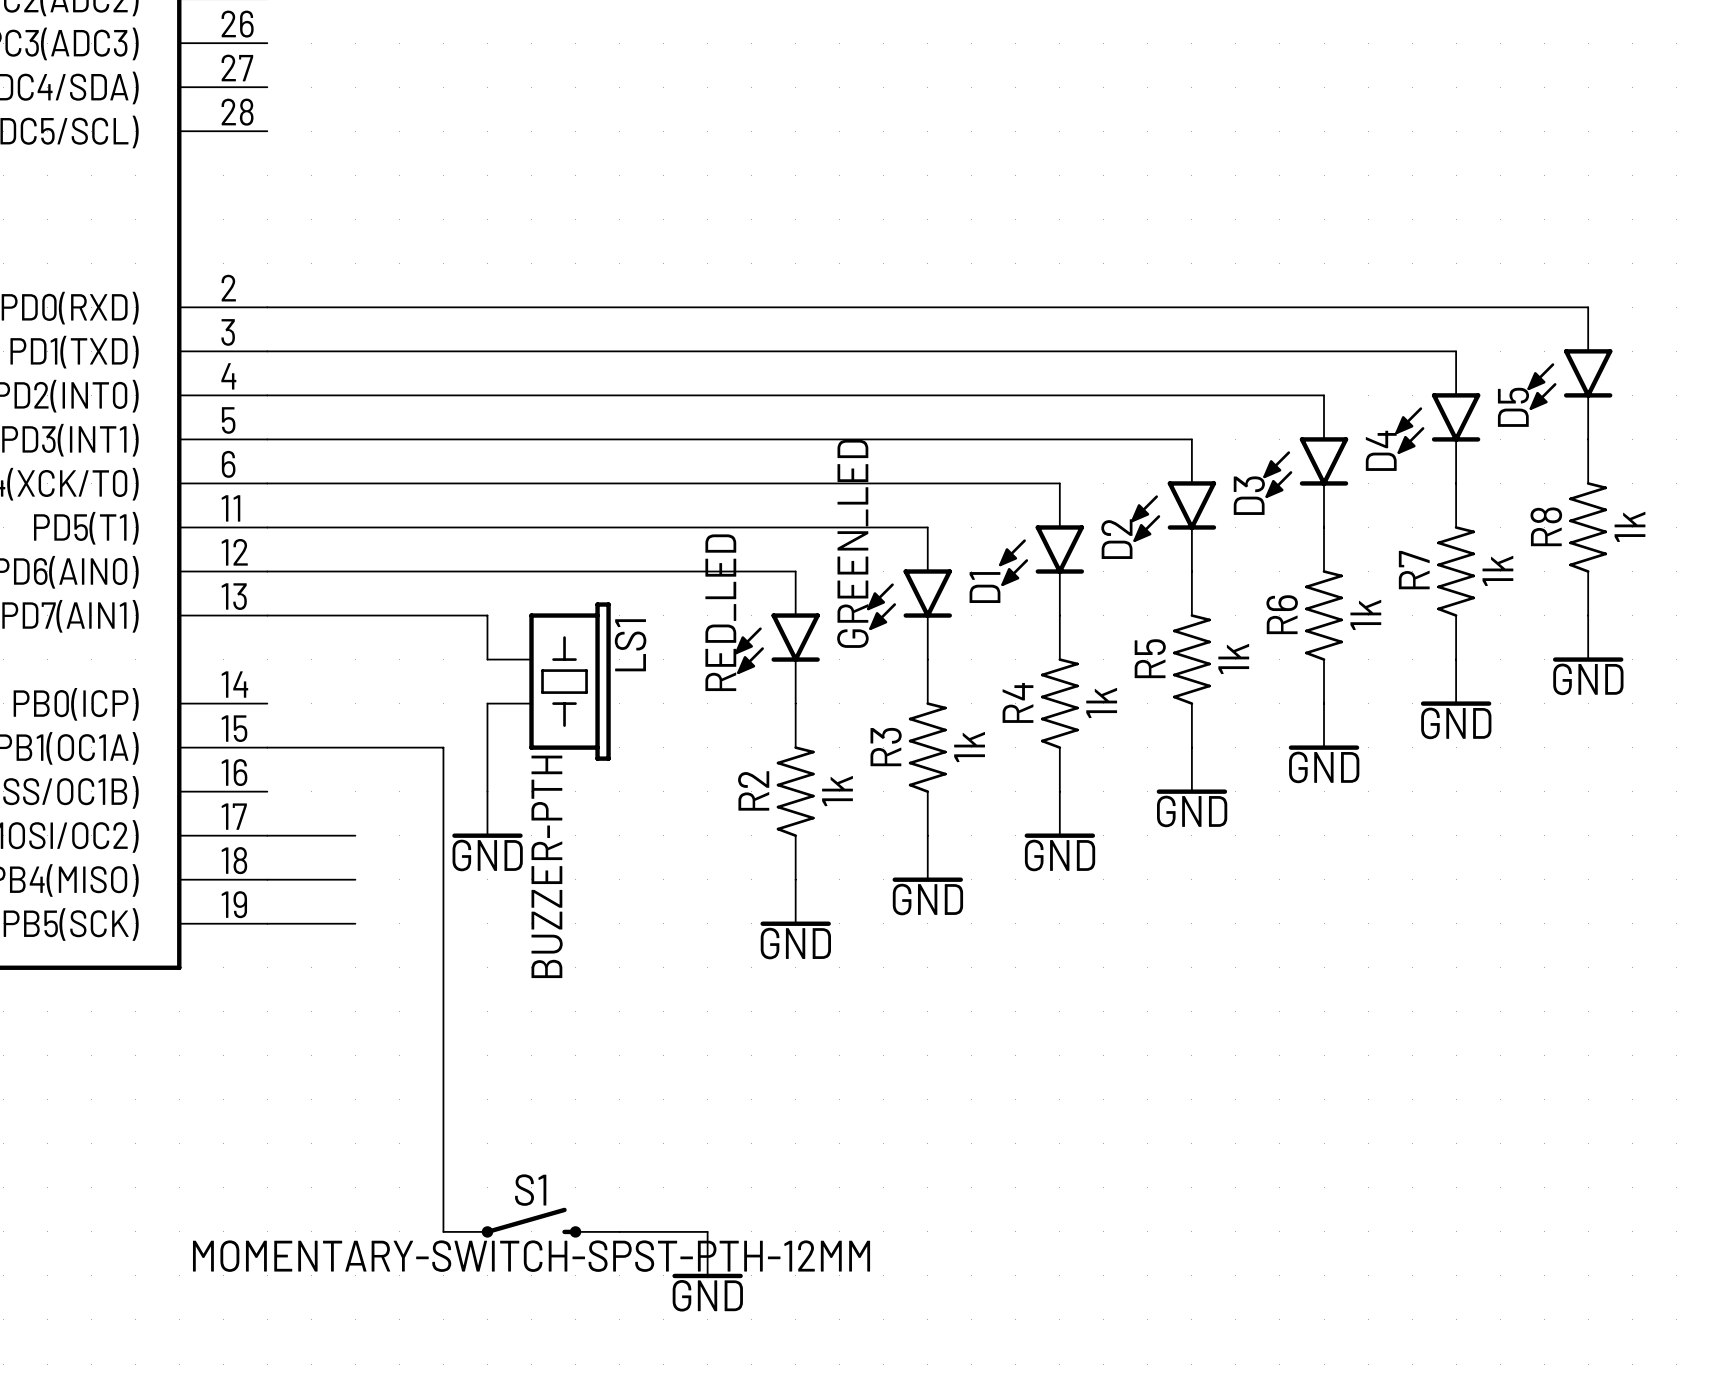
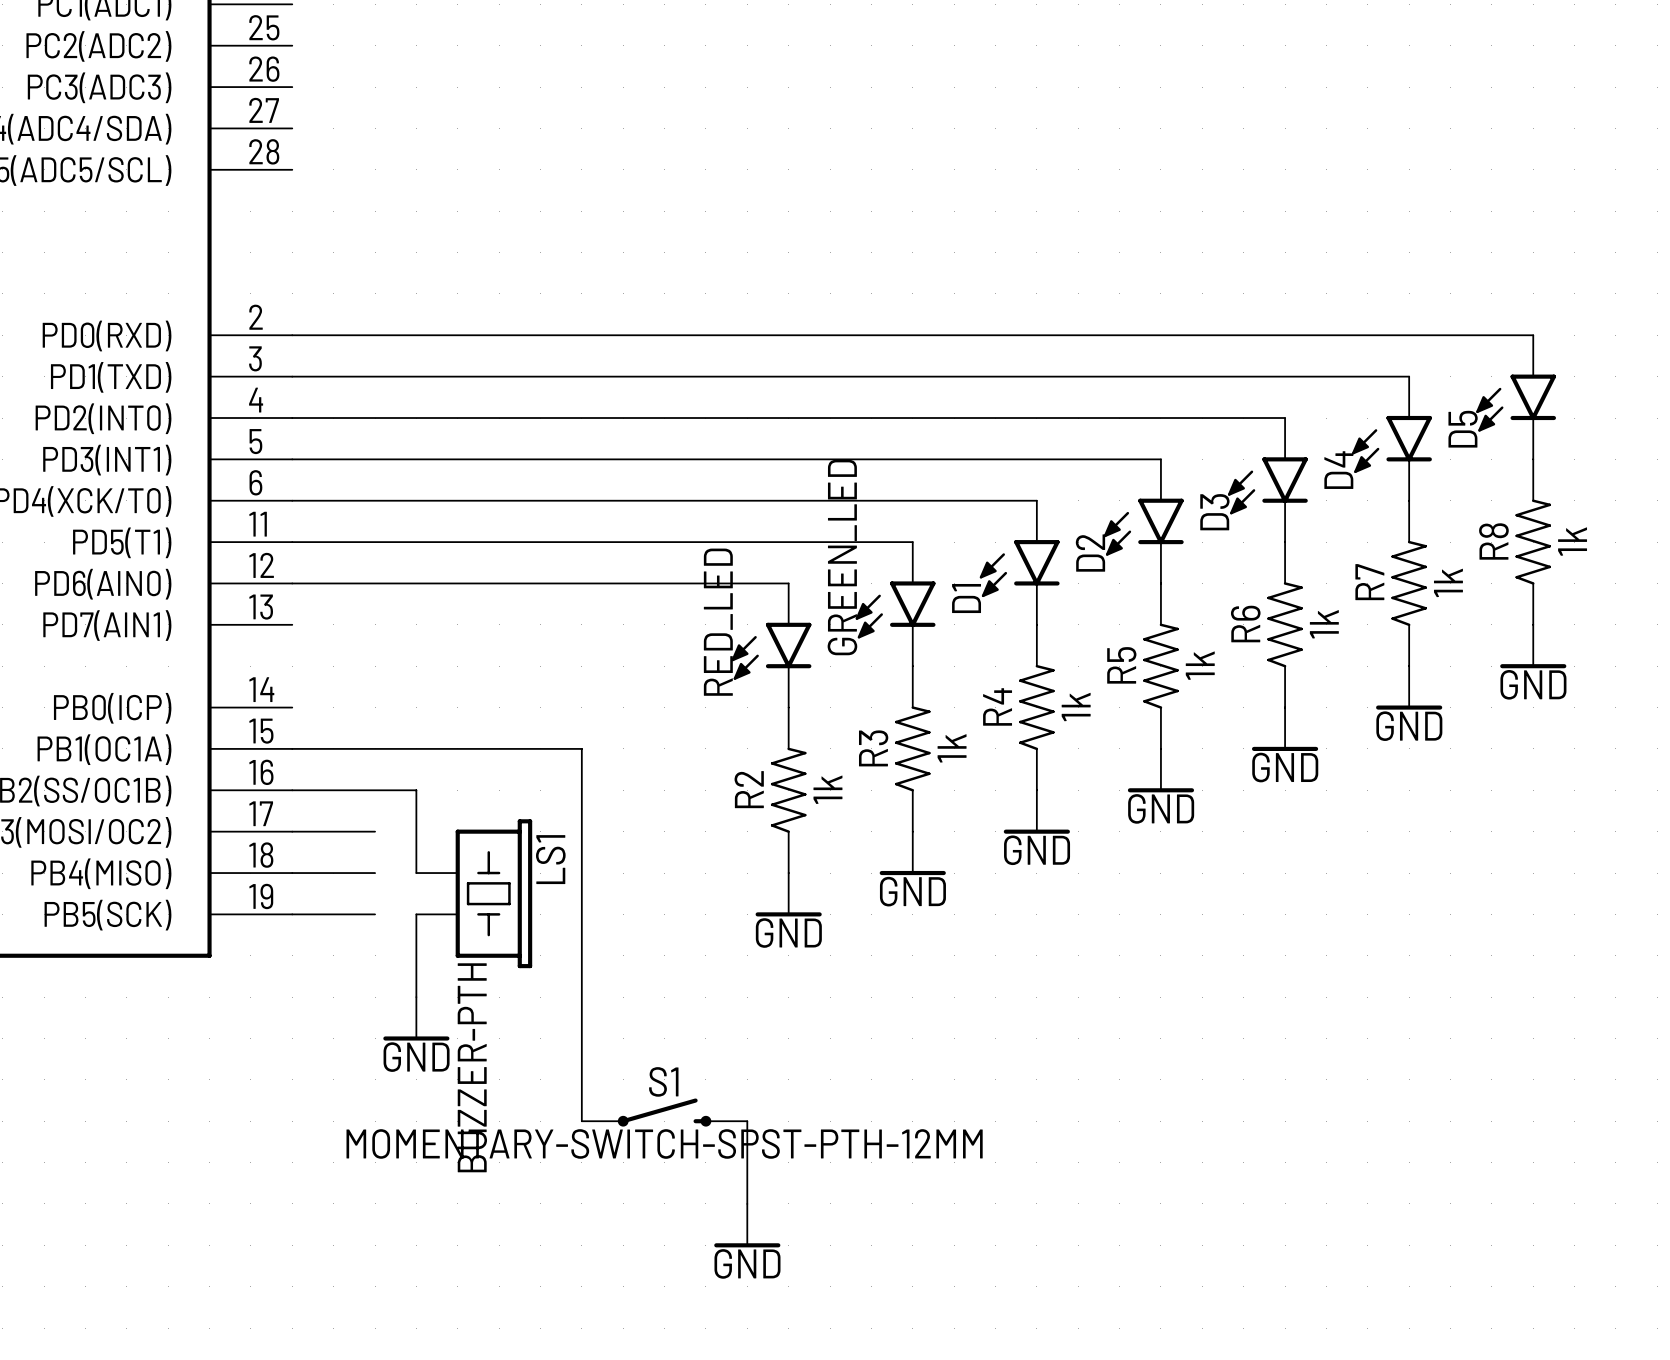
wire: (267, 615) (487, 615) (487, 659) -> none
LS1 position: (549, 681) -> (474, 893)
wire: (487, 703) (487, 791) -> (416, 914) (416, 997)
wire: (443, 747) (443, 1231) -> (457, 748) (581, 748) (581, 1121)
wire: none -> (292, 790) (416, 790) (416, 873)
power symbol: GND (487, 814) -> none
power symbol: none -> GND (416, 1018)
wire: none -> (747, 1121) (747, 1203)
S1 position: (531, 1222) -> (664, 1112)
wire: (619, 1231) (707, 1231) -> none
power symbol position: GND (707, 1255) -> GND (747, 1225)

